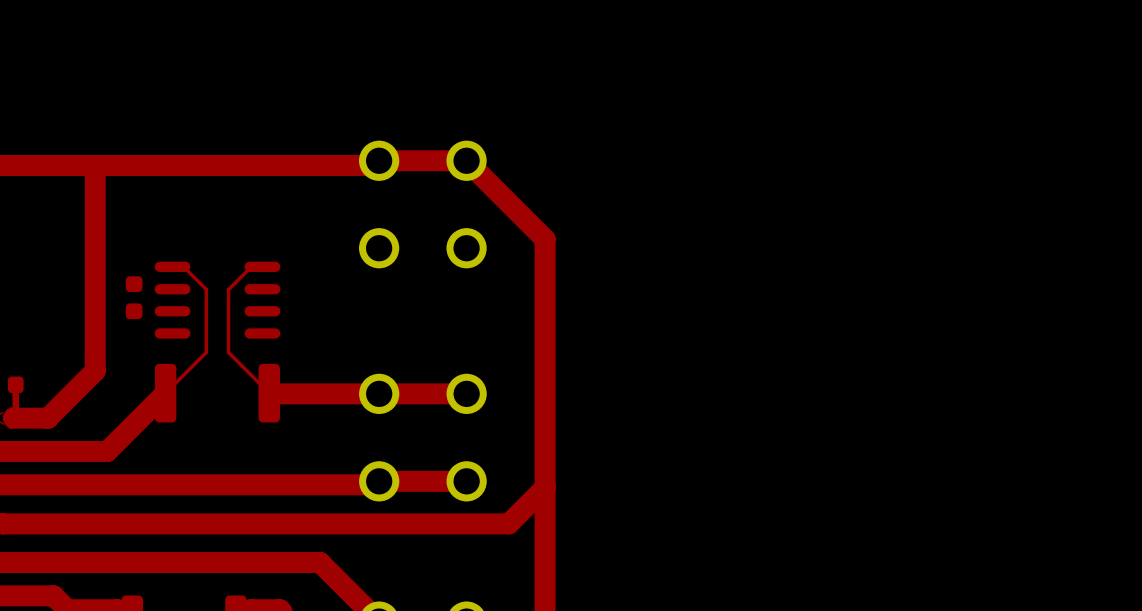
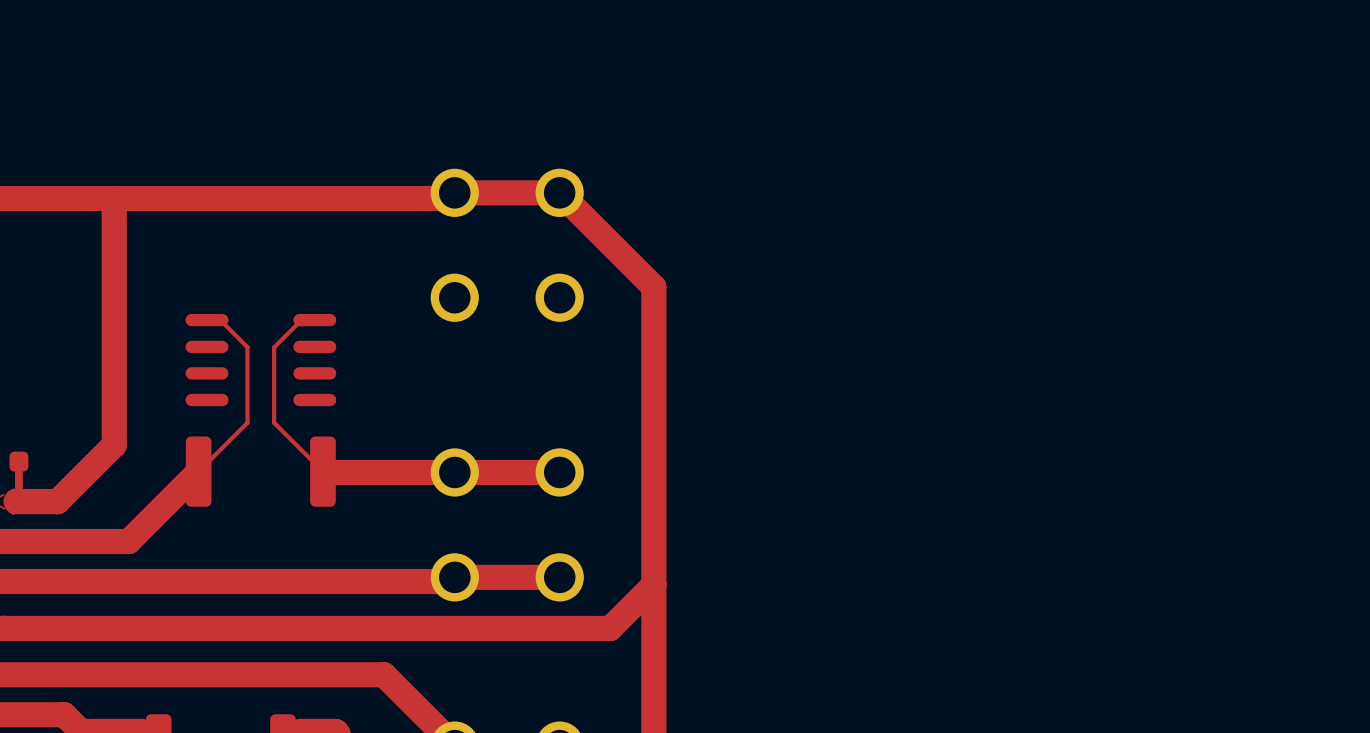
part: (134, 297) -> none

